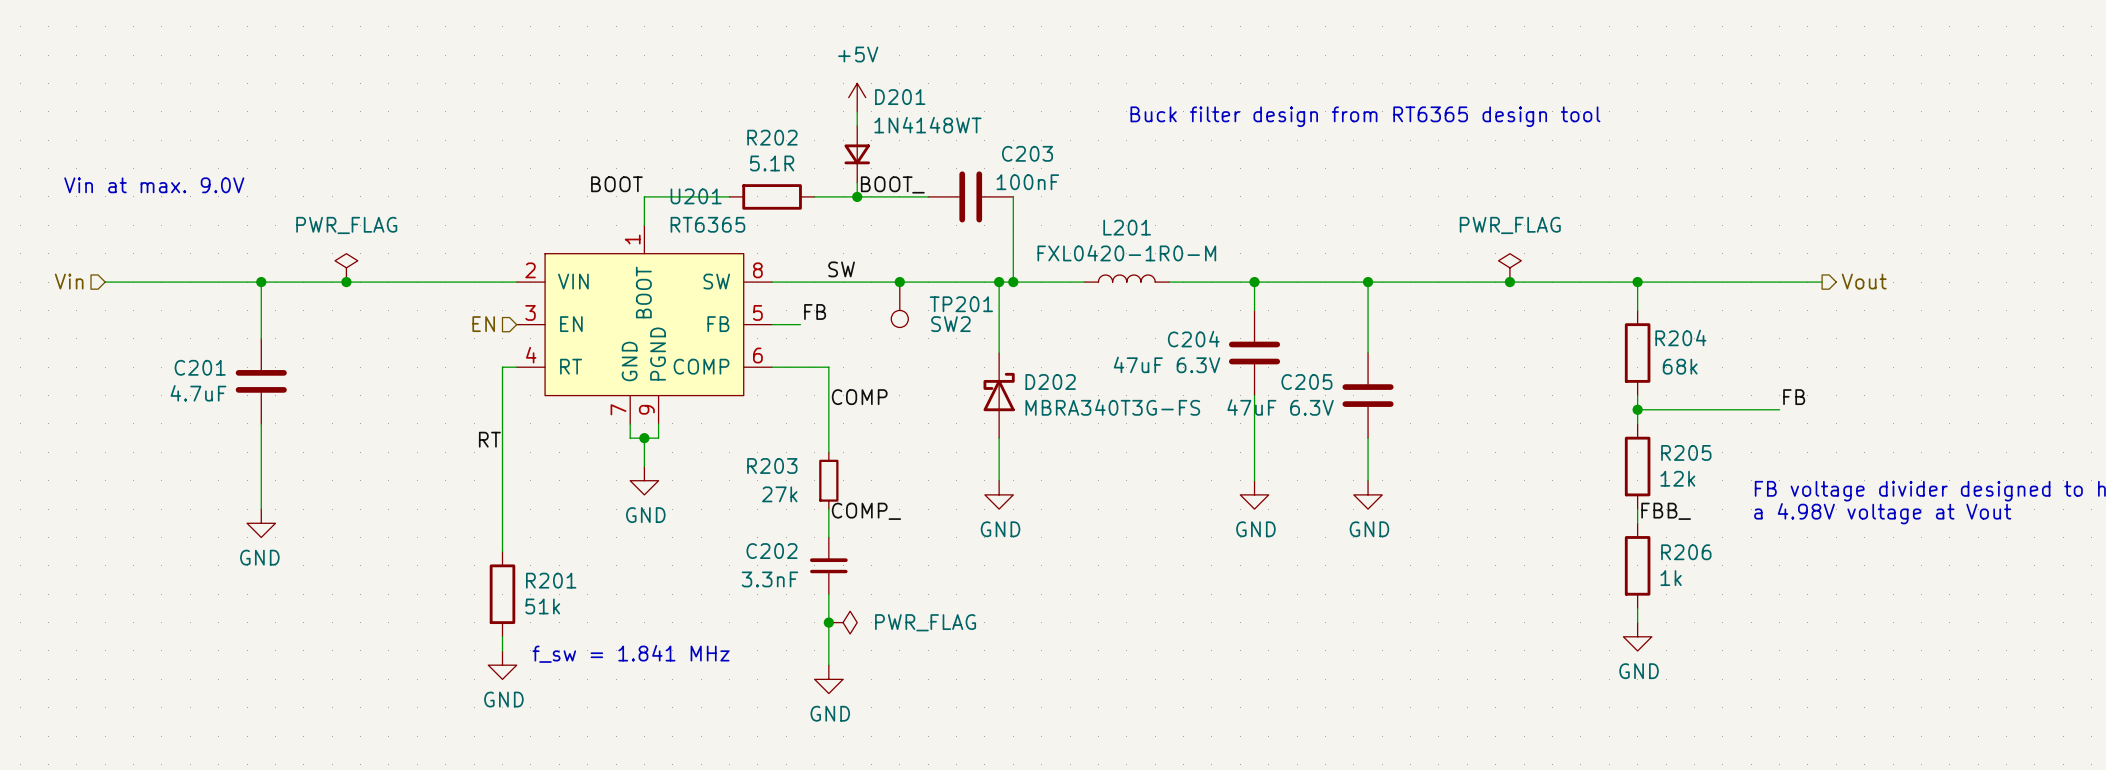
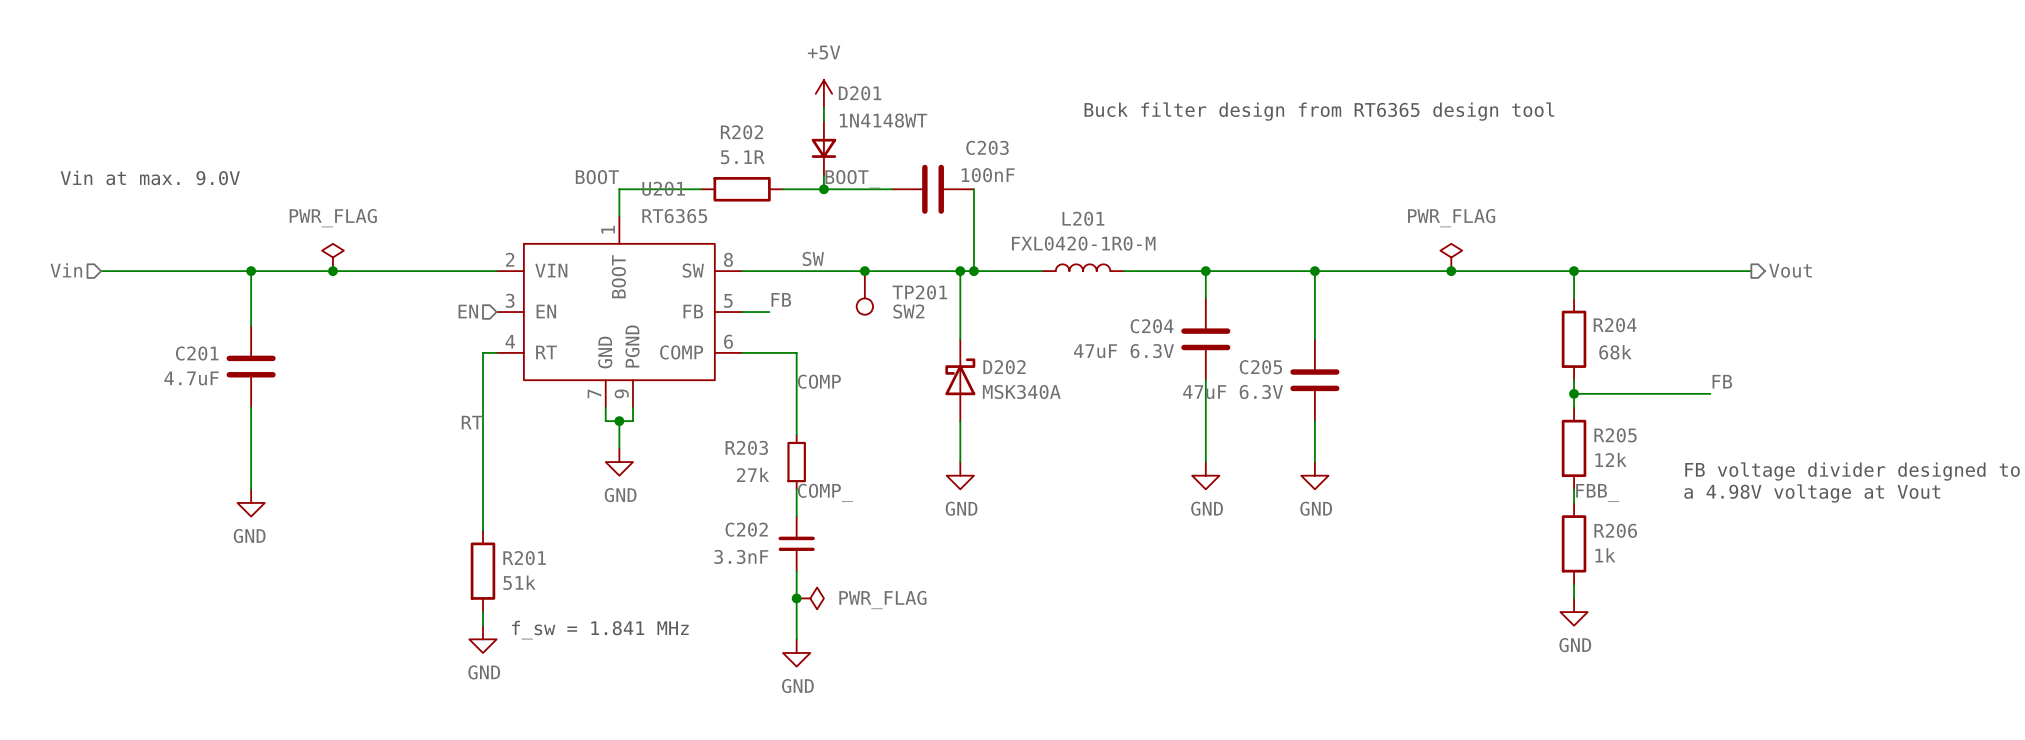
D202 value: MBRA340T3G-FS (1112, 407) -> MSK340A (1021, 391)

